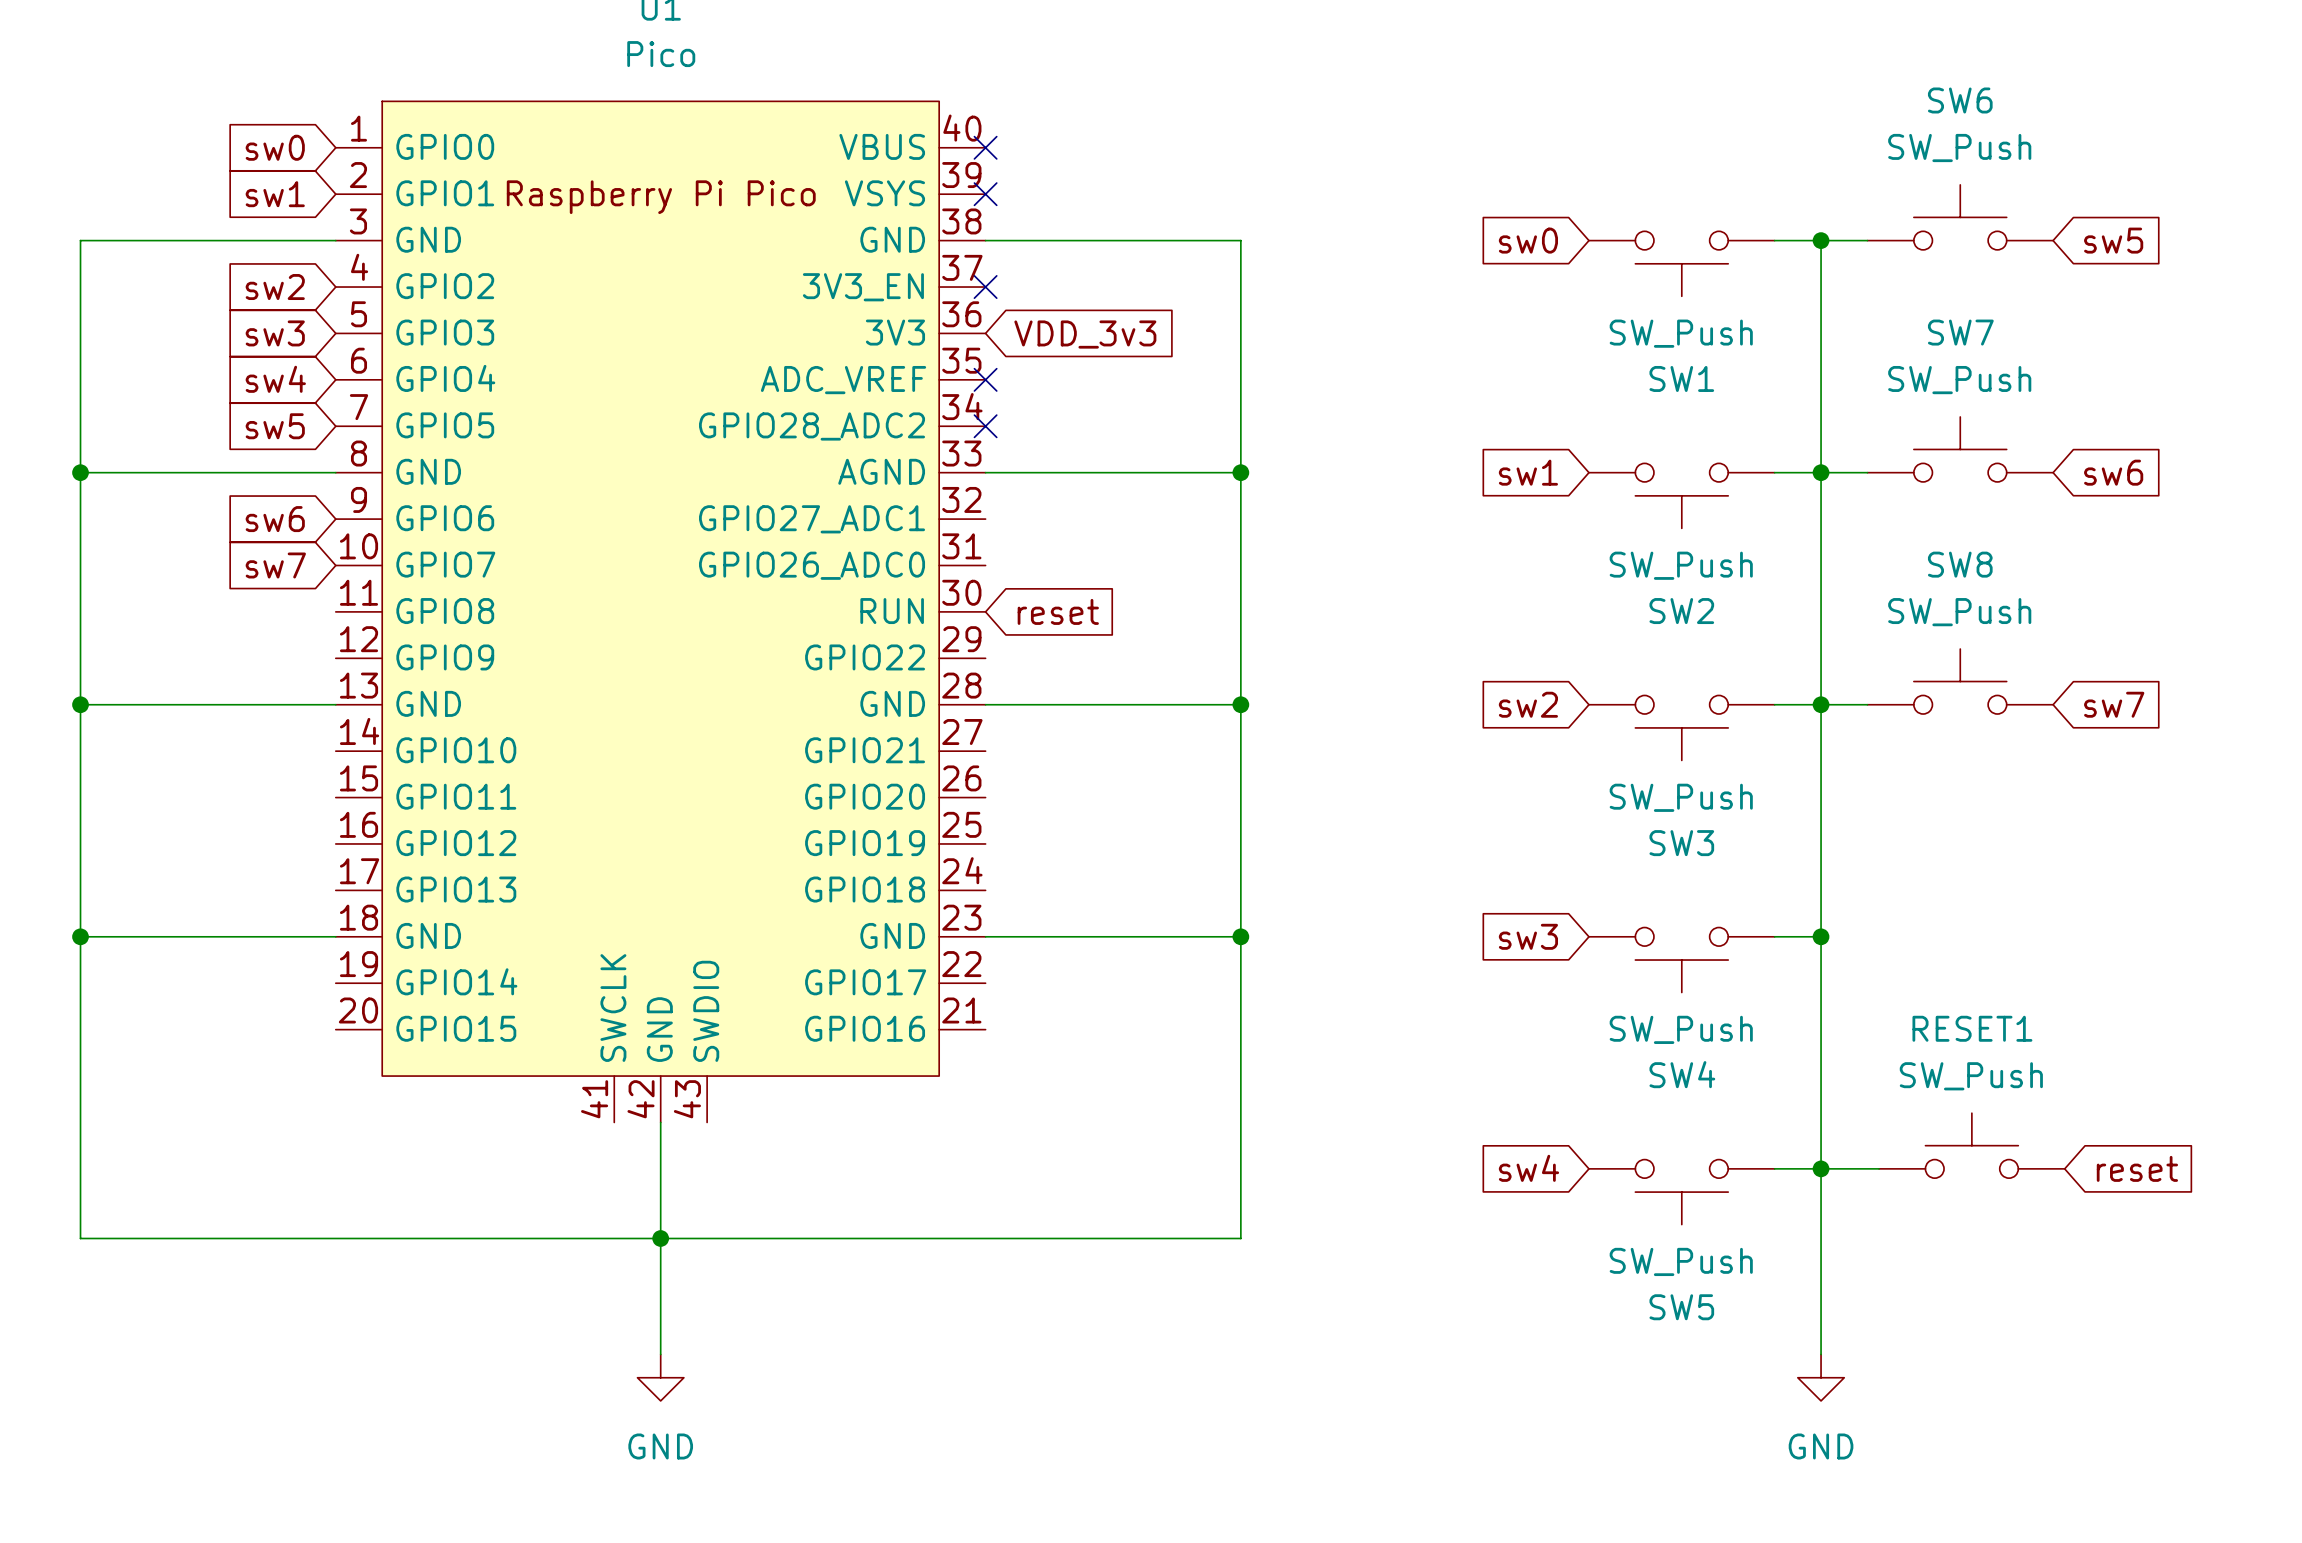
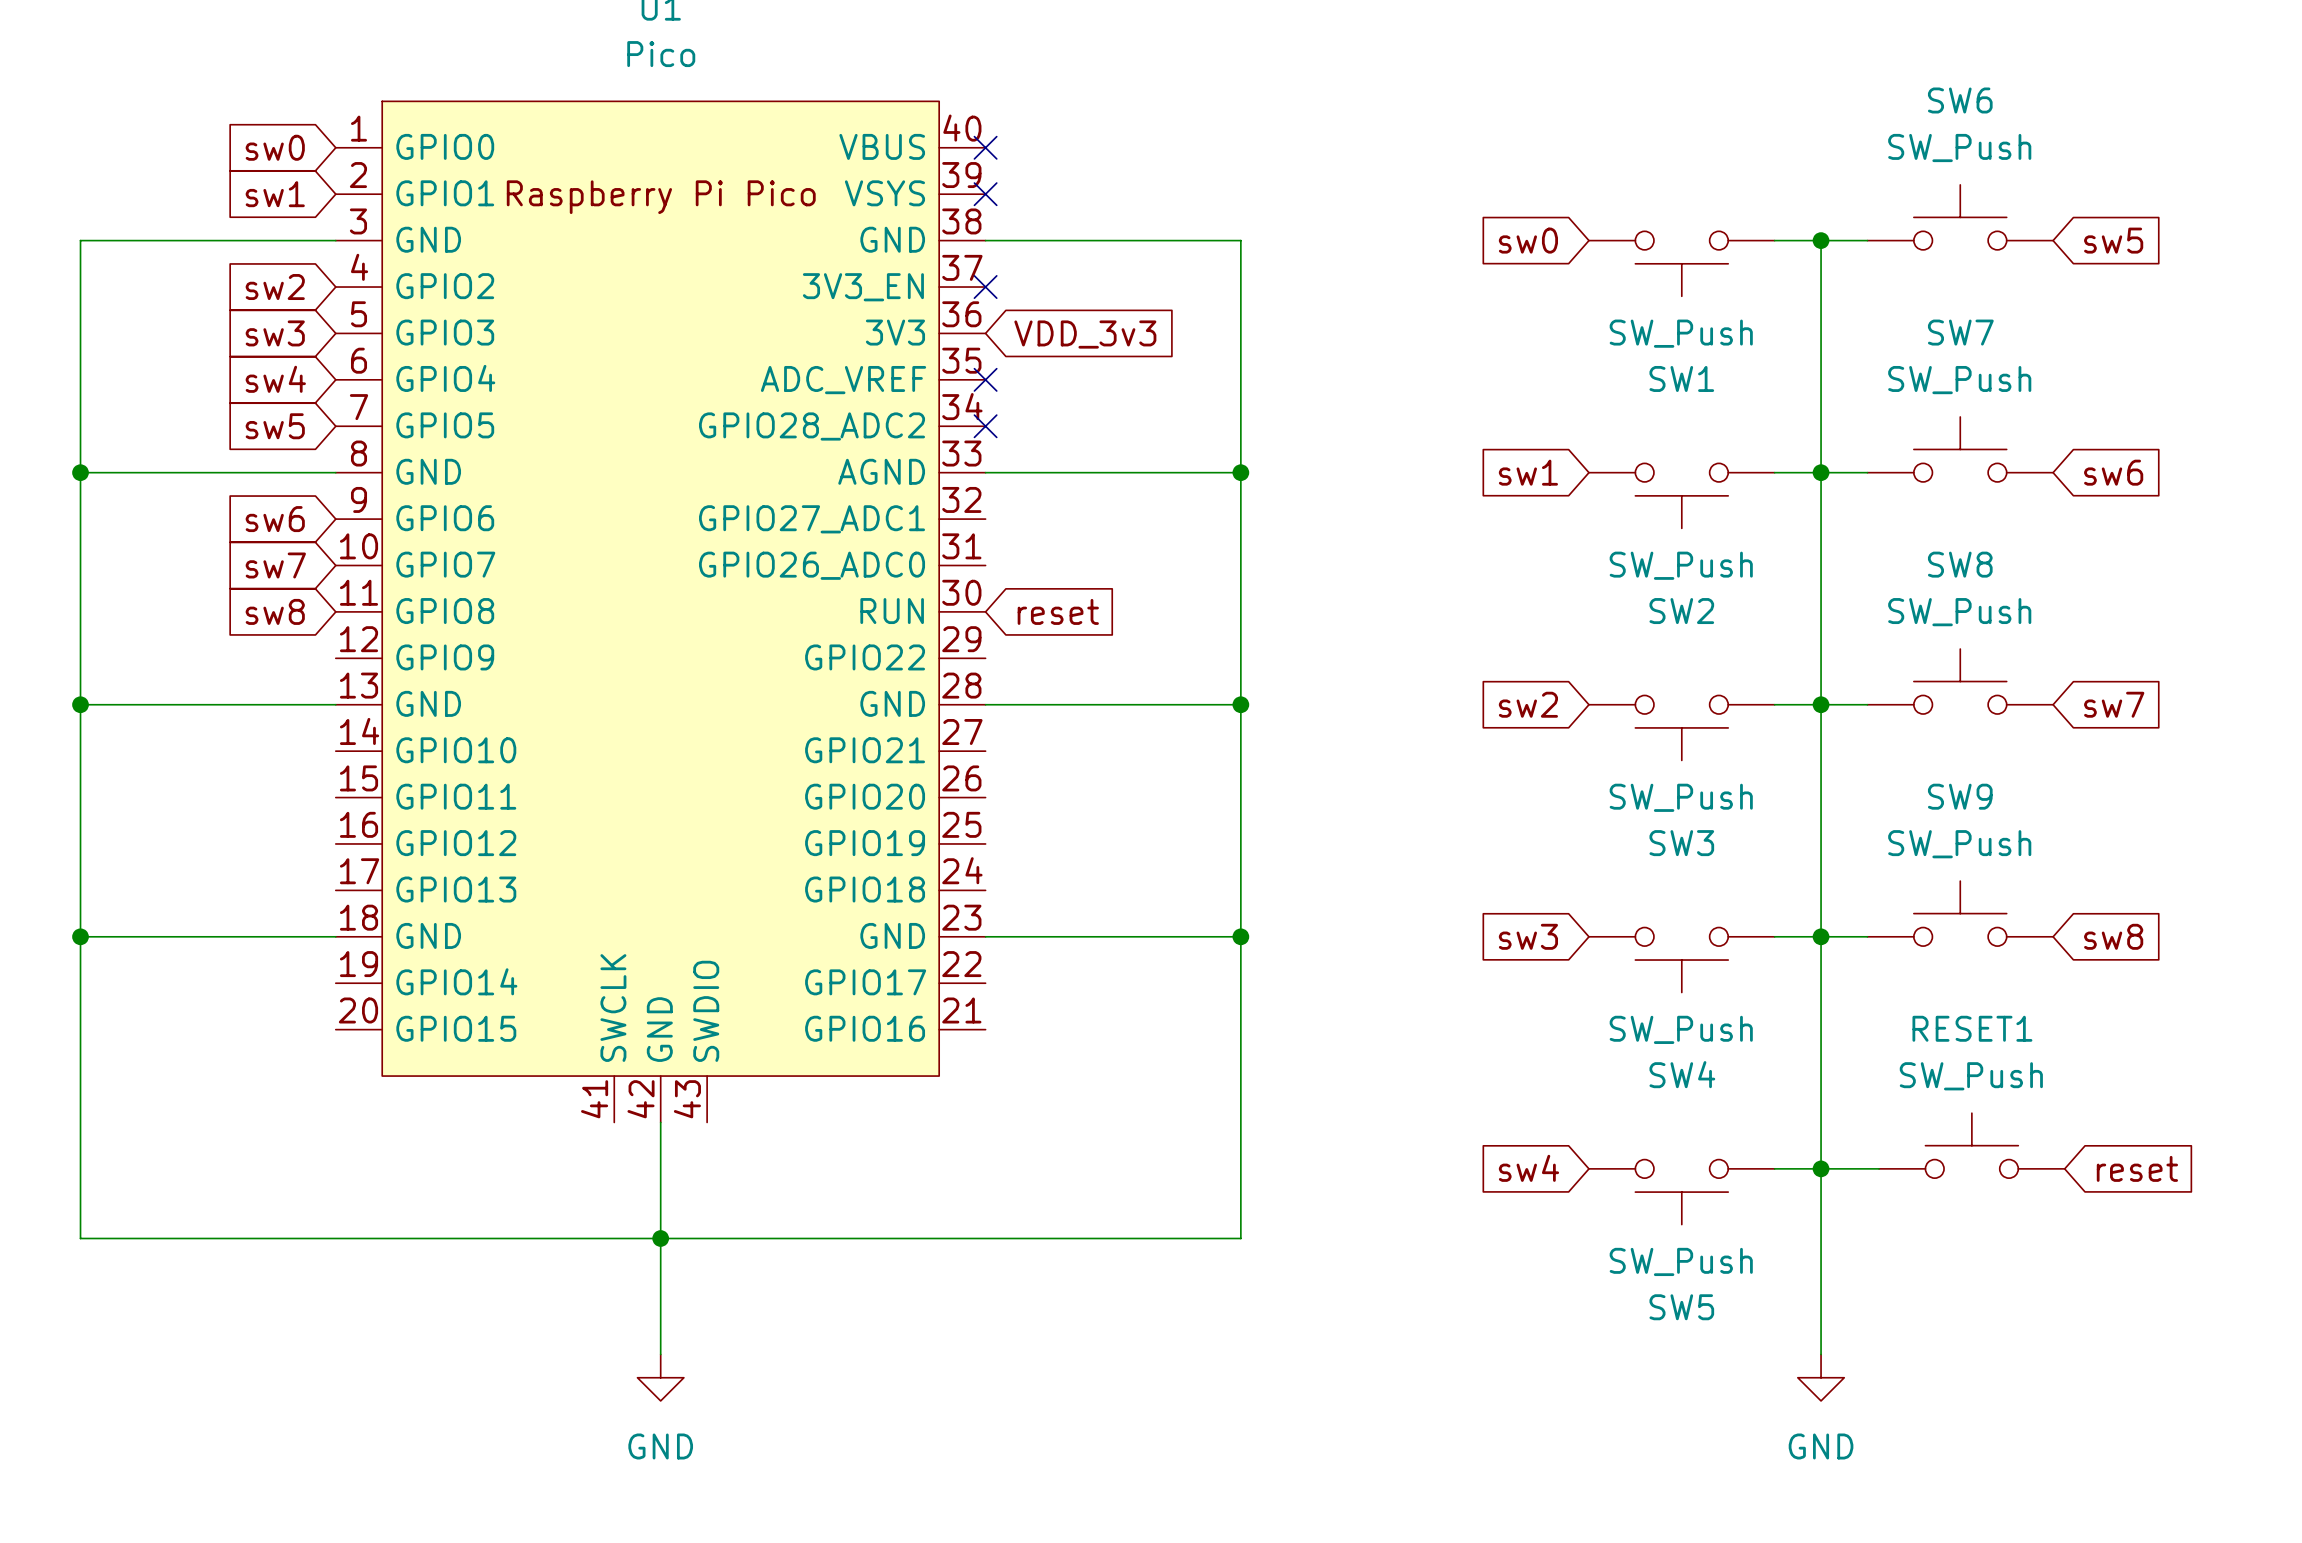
global label: none -> sw8 (275, 611)
SW9: none -> SW_Push (1960, 913)
wire: none -> (1821, 936) (1867, 936)
global label: none -> sw8 (2113, 936)

